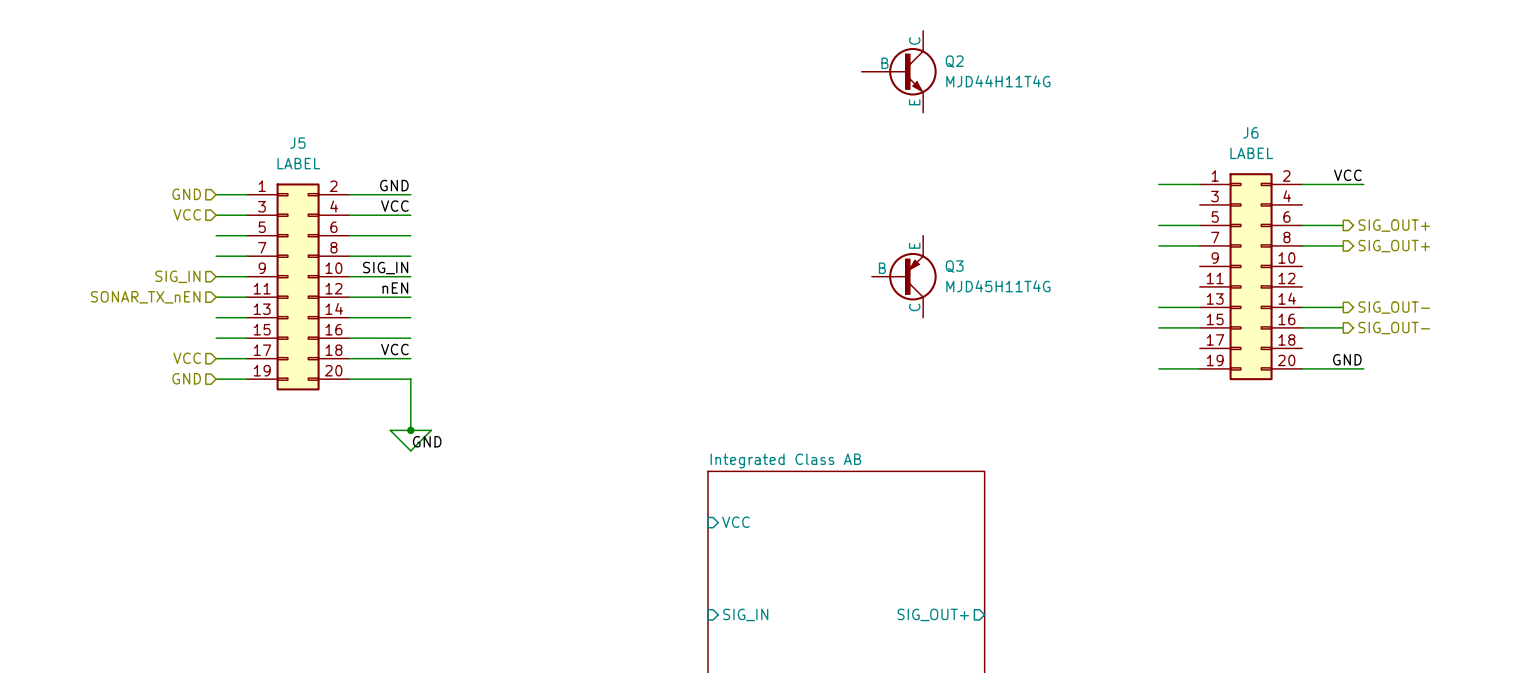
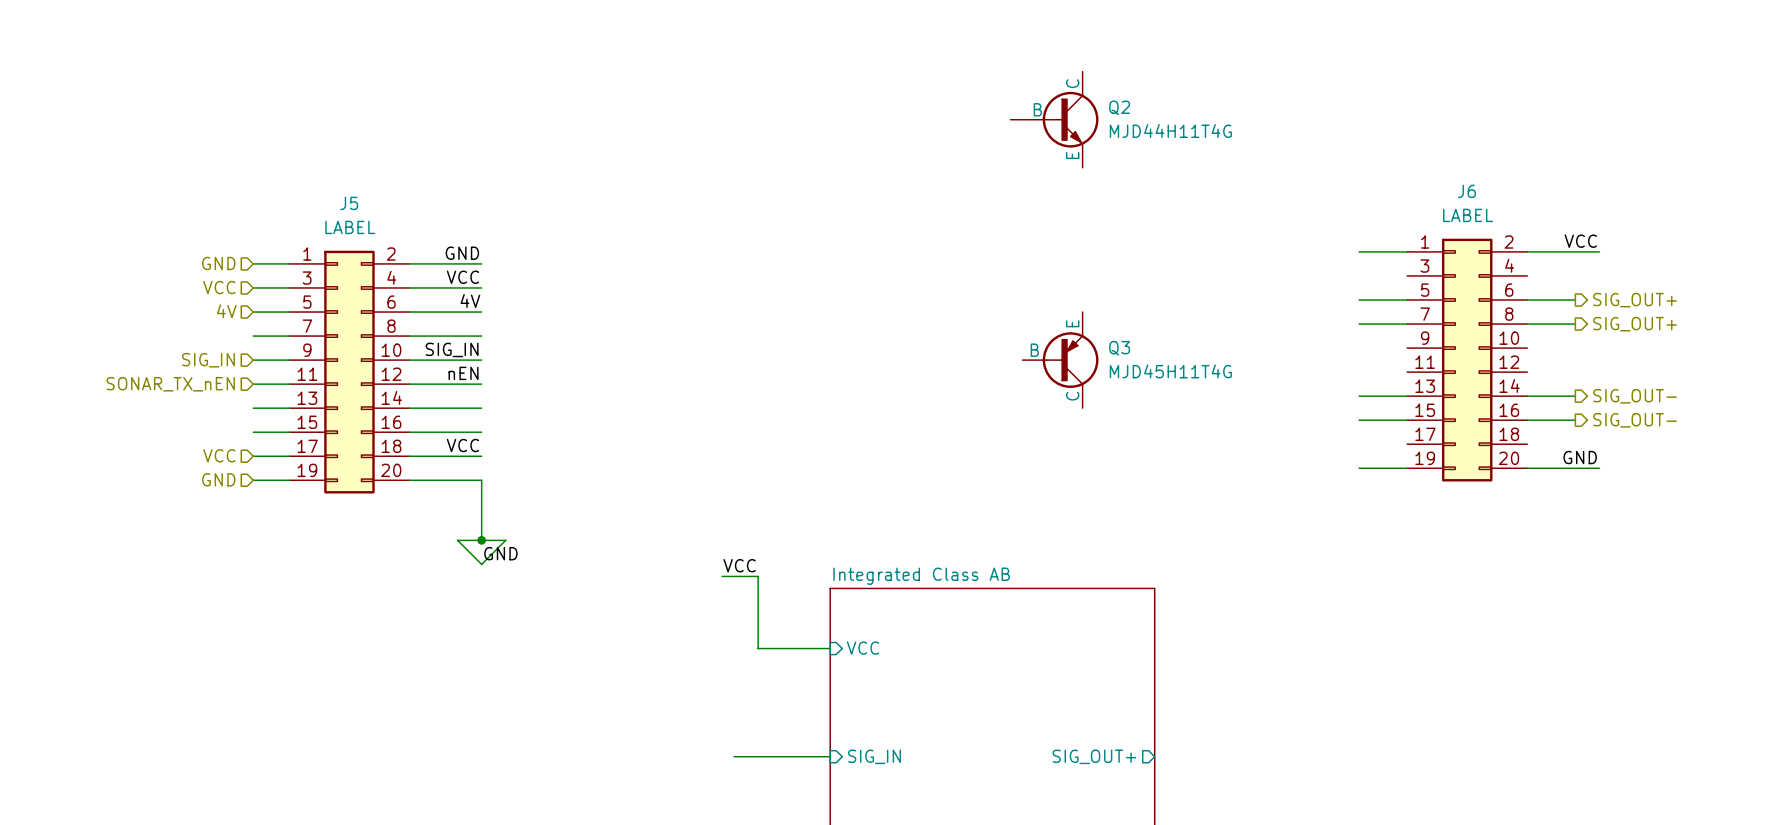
label: none -> 4V (470, 301)
hierarchical label: none -> 4V (226, 311)
label: none -> VCC (739, 565)
wire: none -> (722, 576) (758, 576) (758, 648) (830, 648)
wire: none -> (734, 756) (830, 756)

